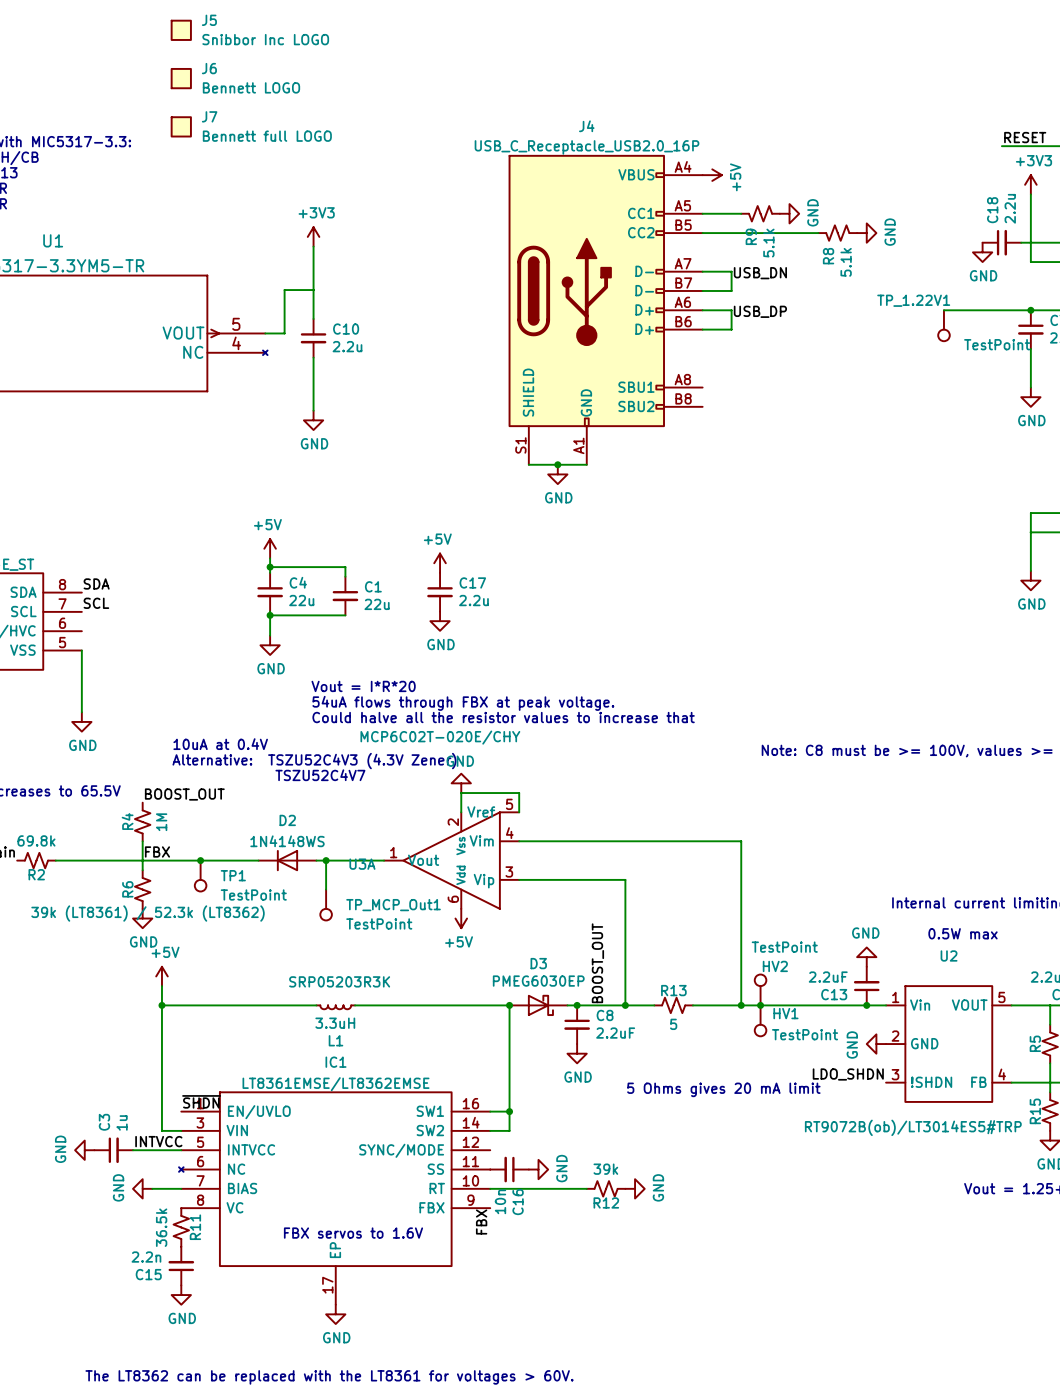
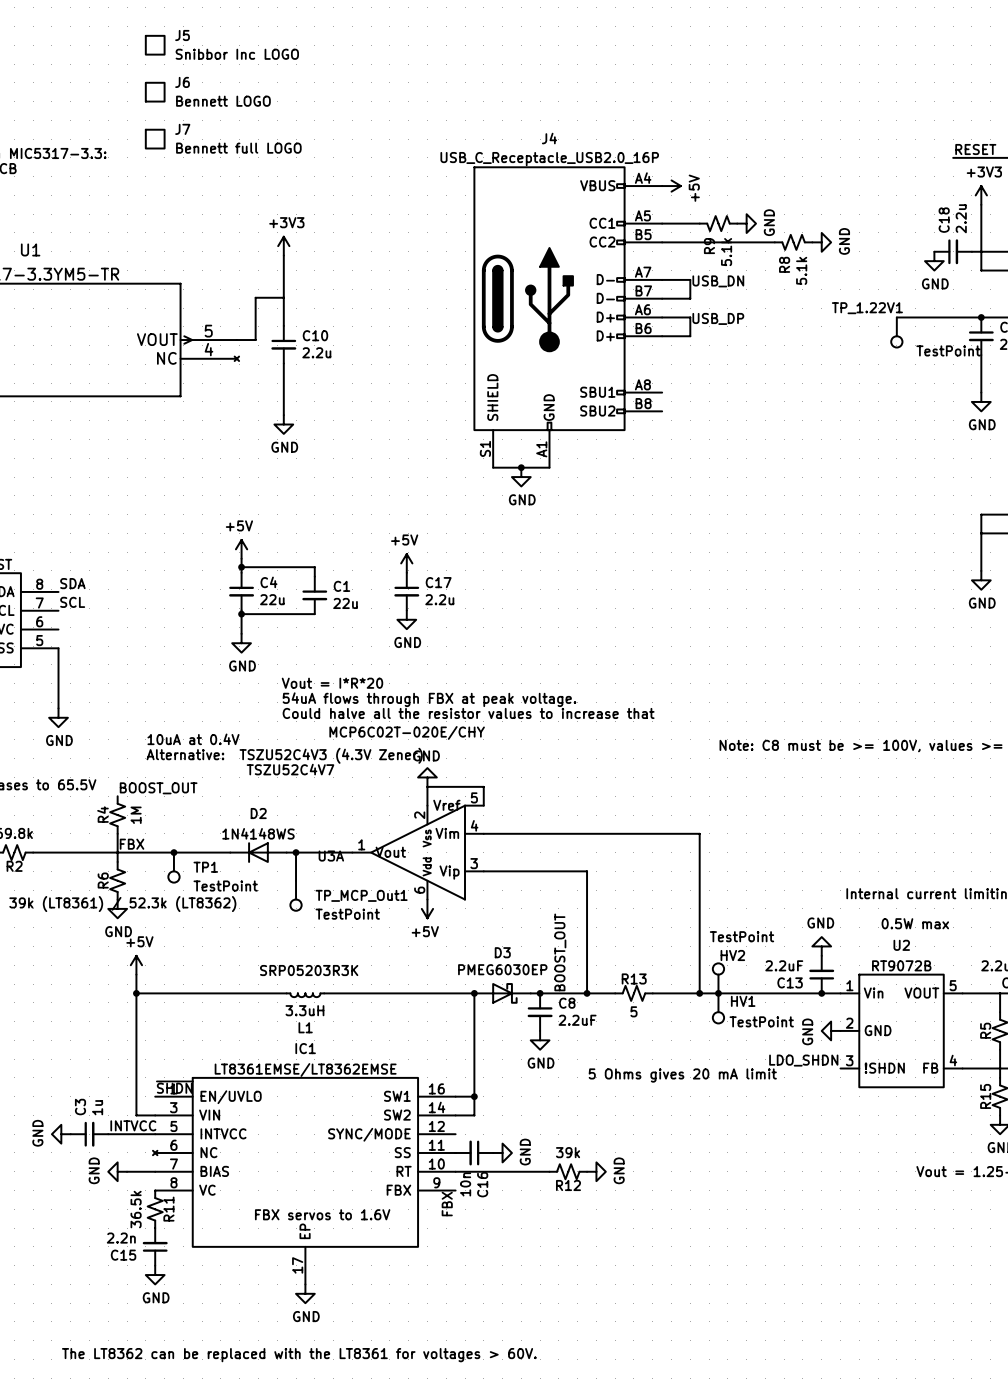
U2 value: RT9072B(ob)/LT3014ES5#TRP (913, 1127) -> RT9072B (901, 965)

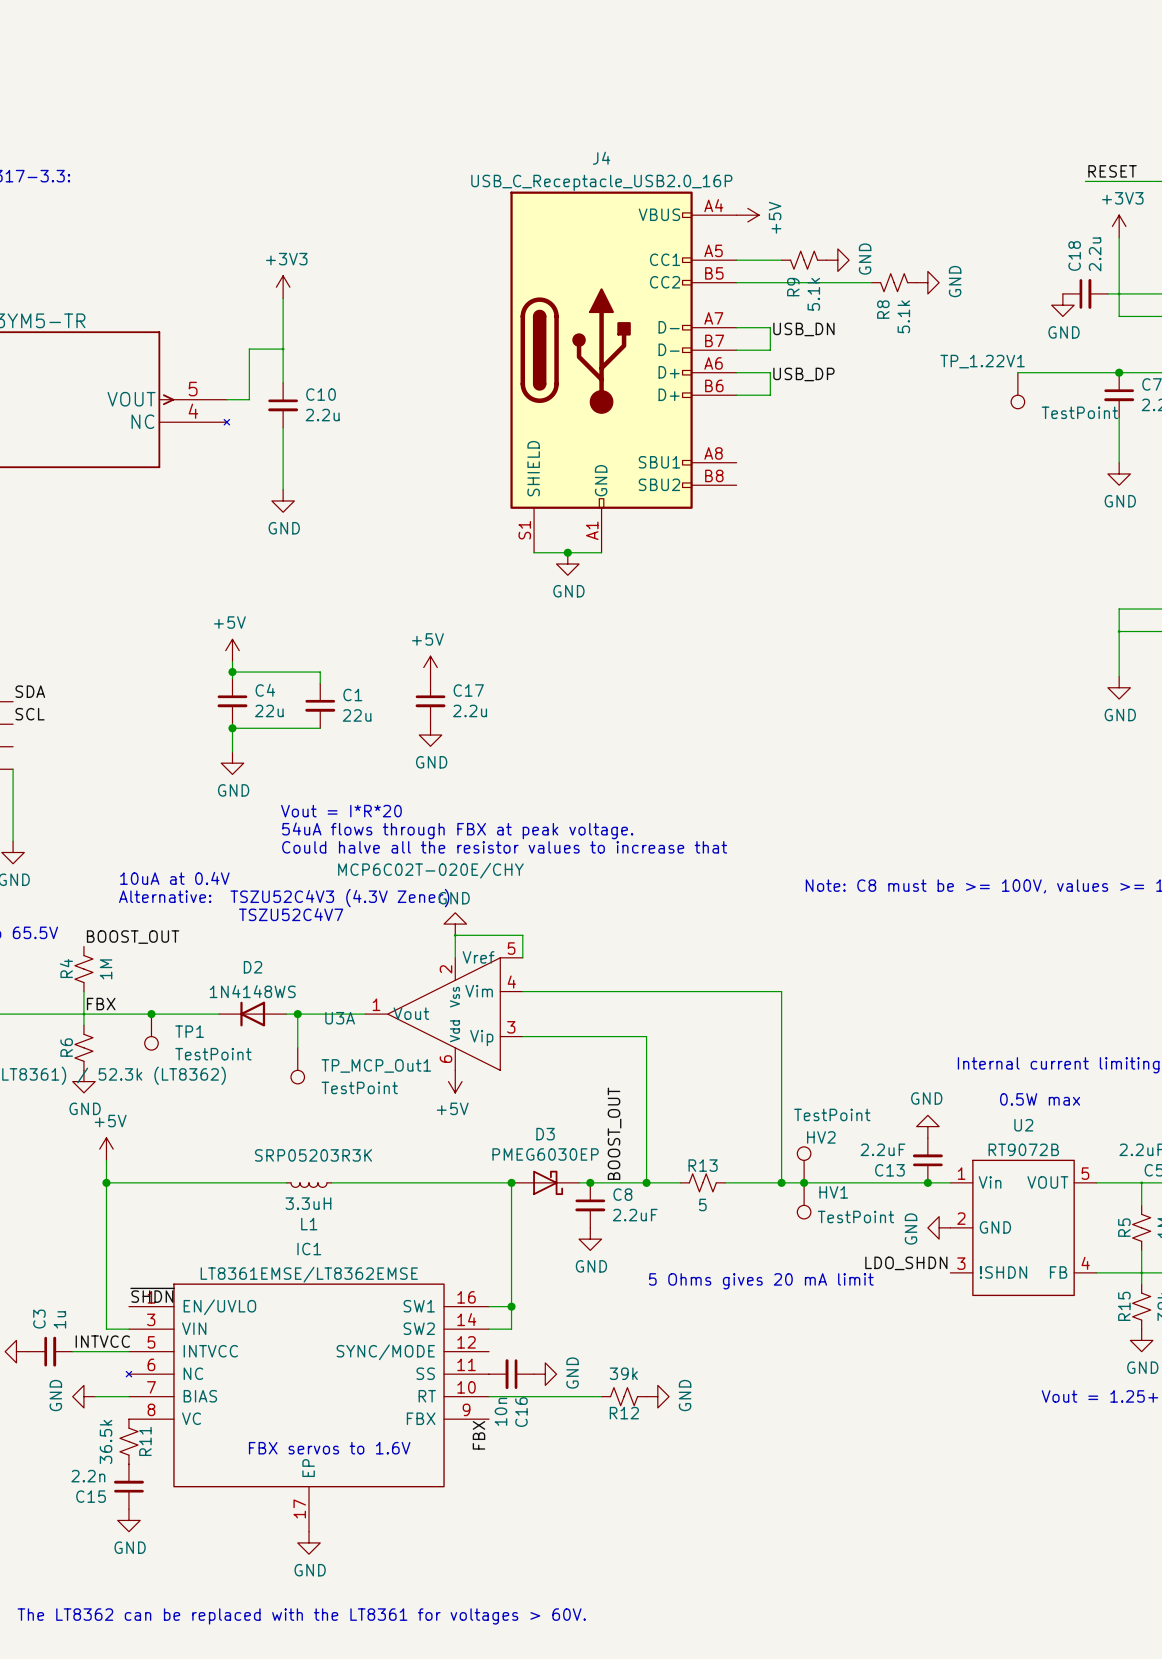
J5: Snibbor Inc LOGO (155, 45) -> none
J6: Bennett LOGO (155, 92) -> none
J7: Bennett full LOGO (155, 139) -> none

